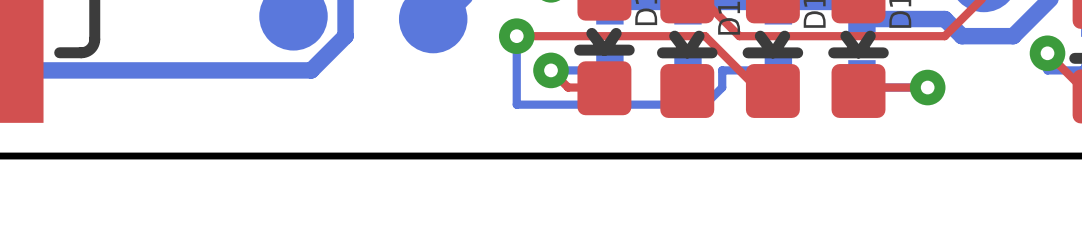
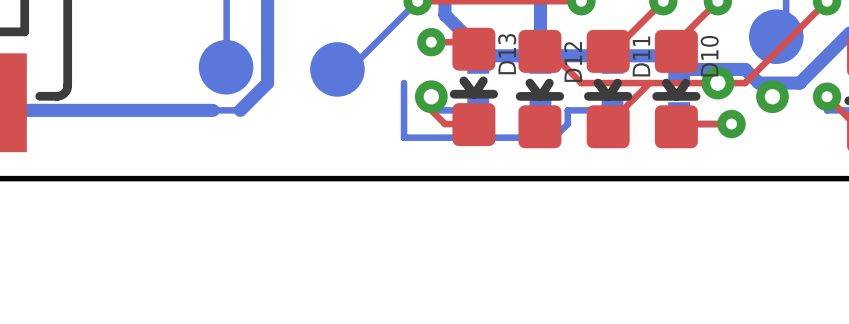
top track: (516, 36) (705, 36) (756, 87) (772, 90) -> (649, 83) (608, 124) (608, 126)
via: (516, 36) -> none
via: none -> (717, 83)
via: none -> (772, 96)
bottom track width: thick (277, 70) (311, 70) -> thin (212, 110) (240, 110)
via position: (551, 70) -> (431, 96)

